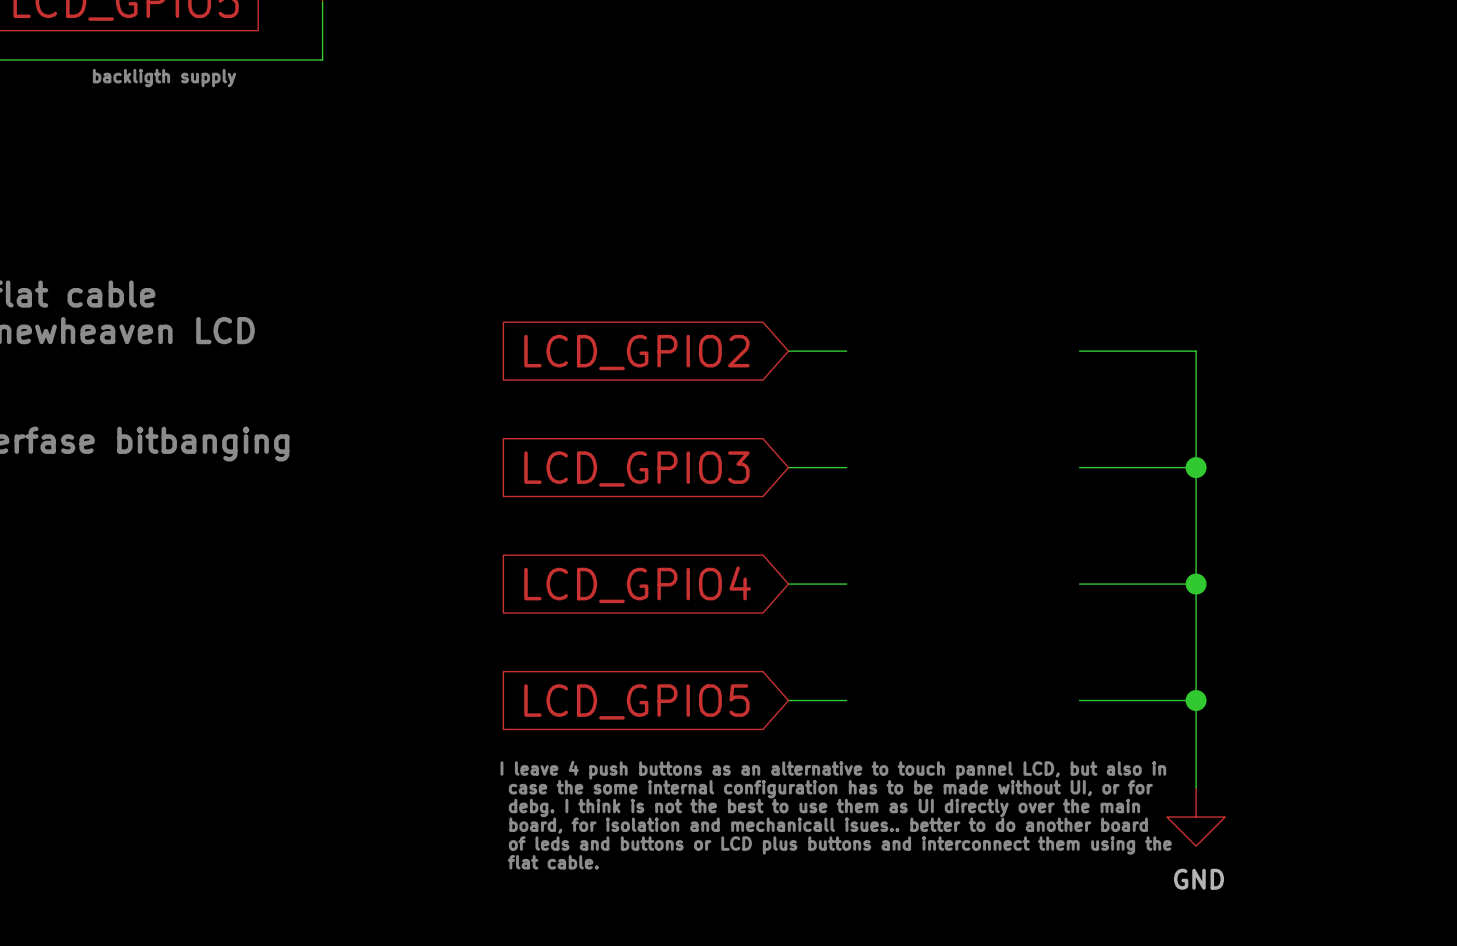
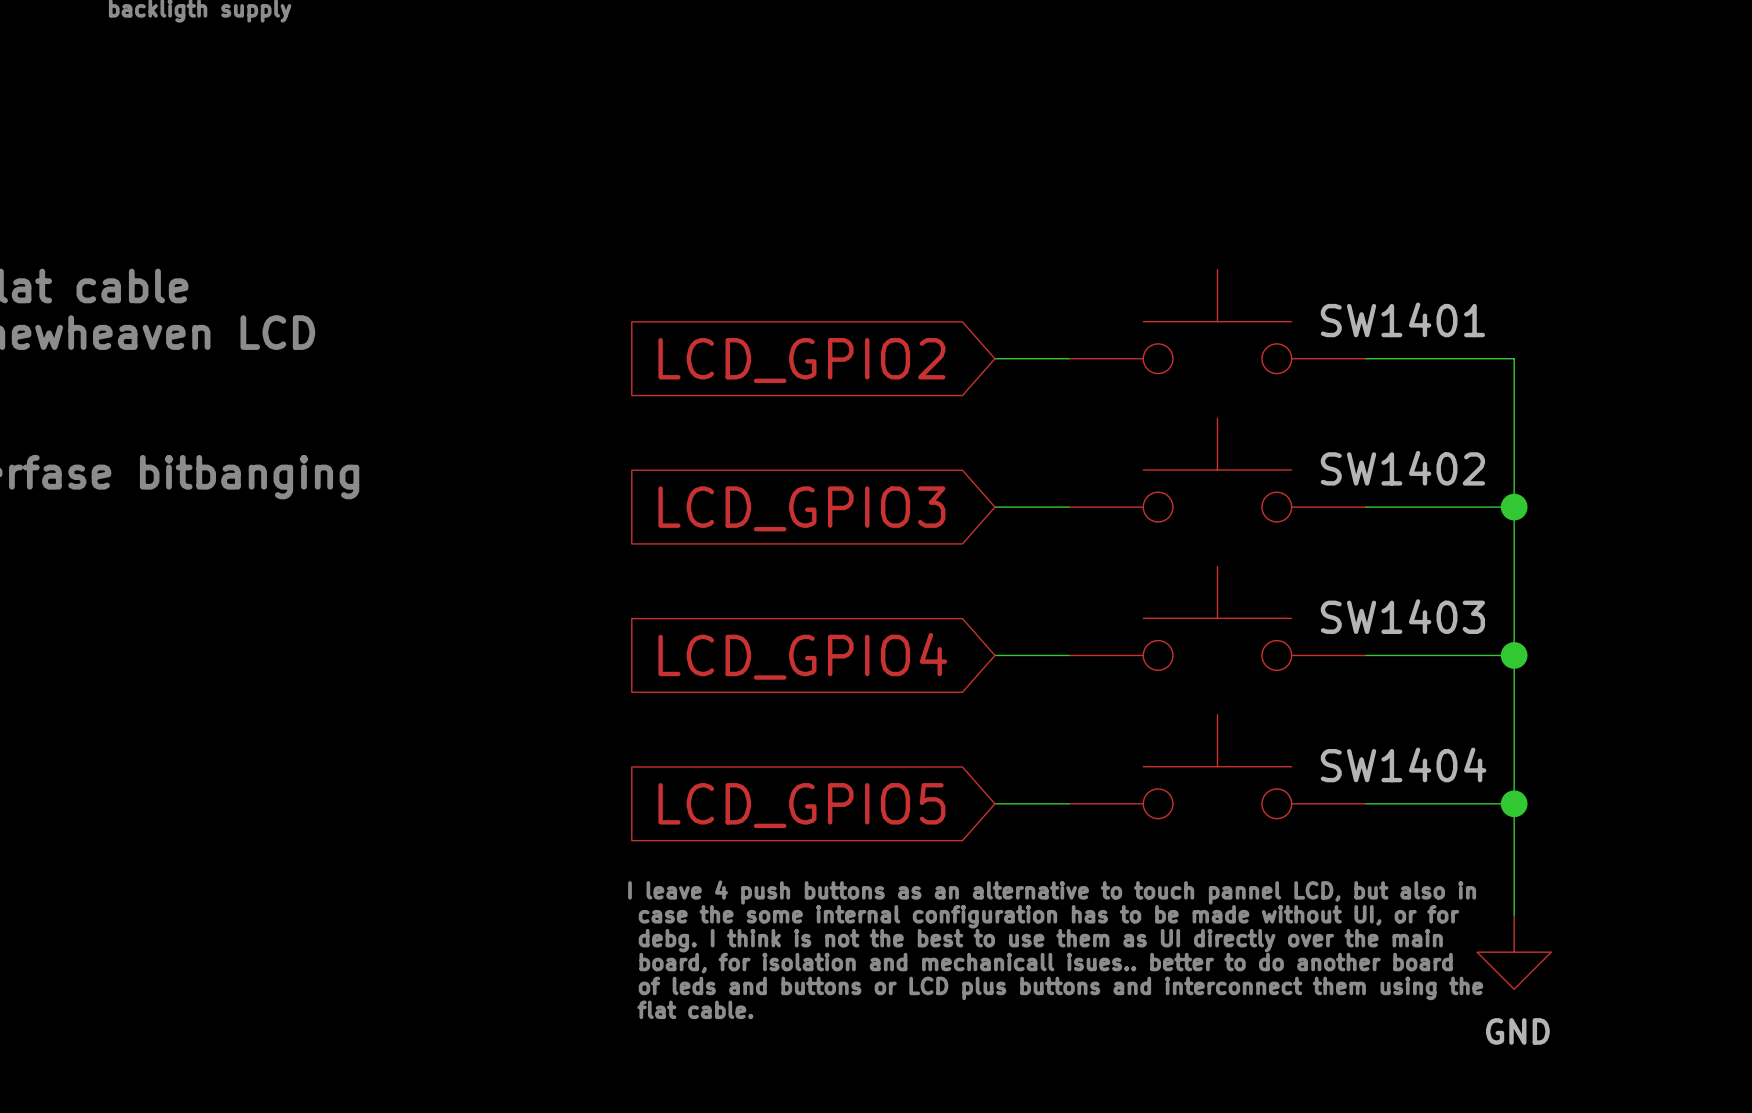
SW1401: none -> (1217, 321)
SW1402: none -> (1217, 470)
SW1403: none -> (1217, 618)
SW1404: none -> (1217, 766)

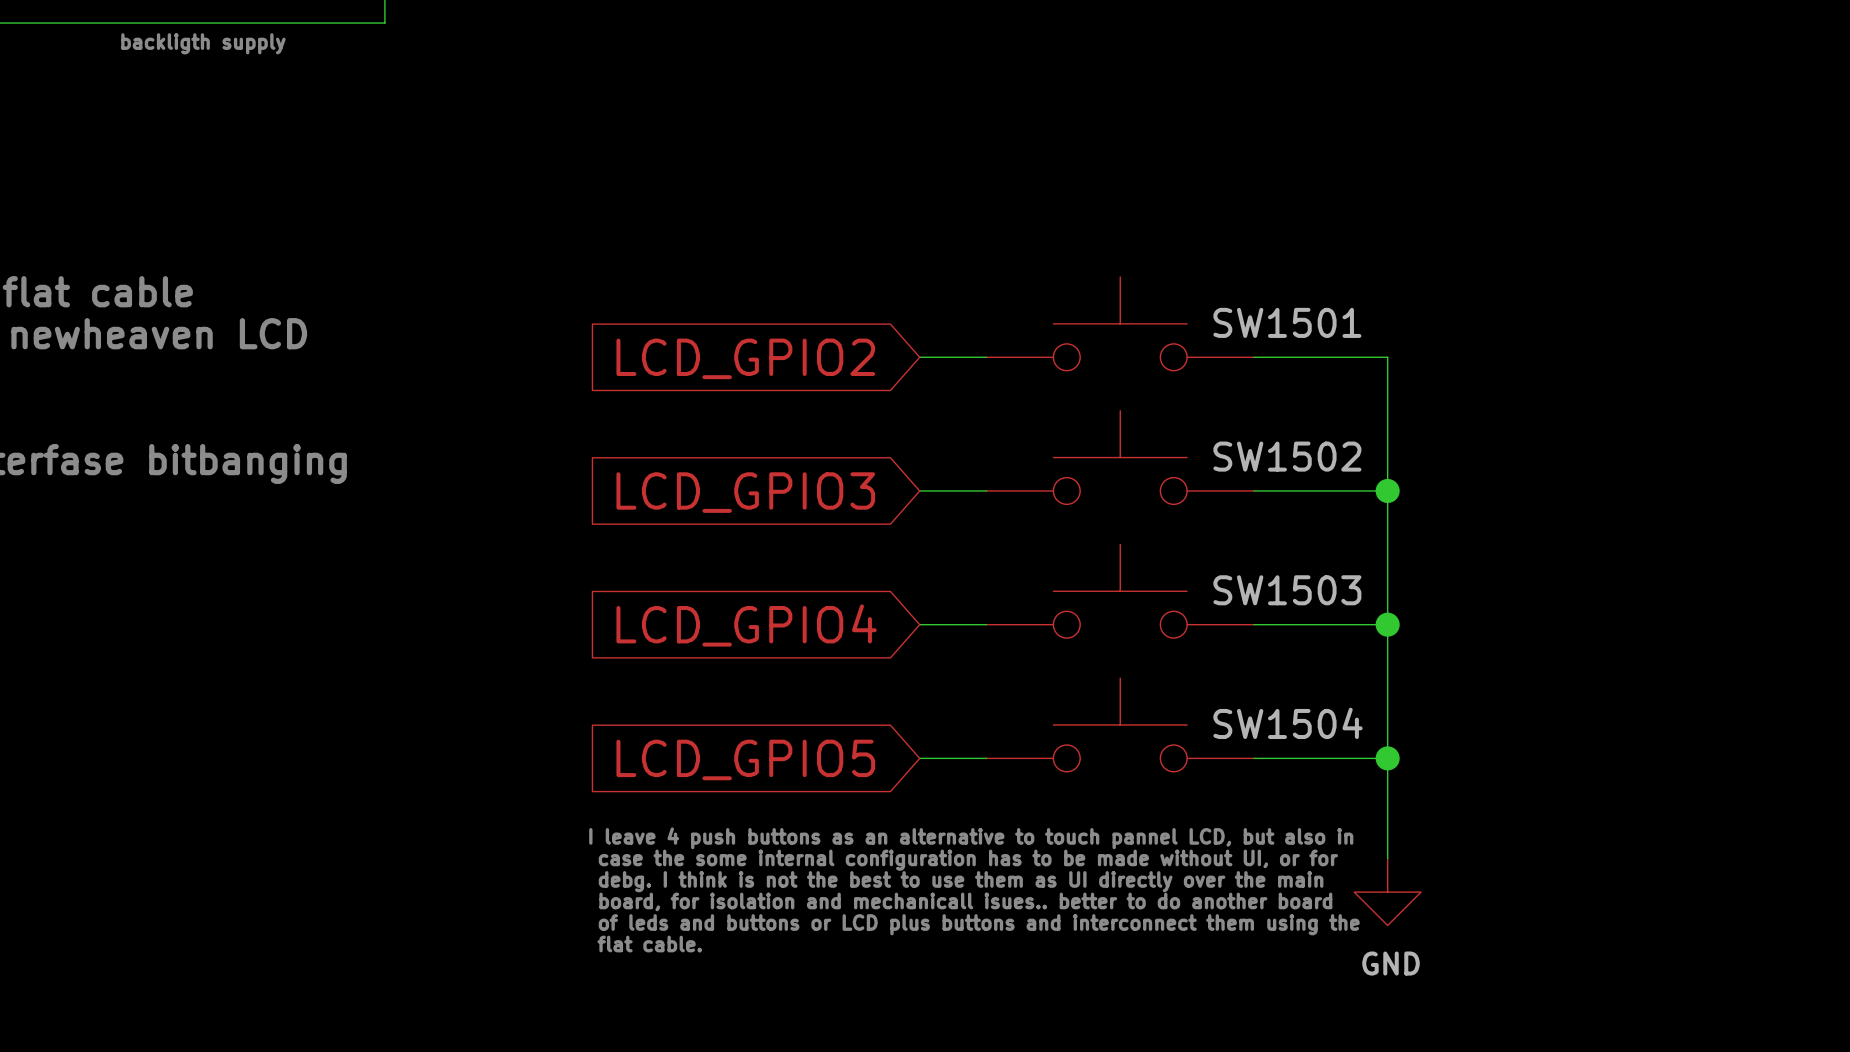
SW1401 name: SW1401 (1402, 319) -> SW1501 (1287, 322)
SW1402 name: SW1402 (1402, 468) -> SW1502 (1287, 456)
SW1403 name: SW1403 (1402, 616) -> SW1503 (1287, 590)
SW1404 name: SW1404 (1403, 764) -> SW1504 (1288, 723)

